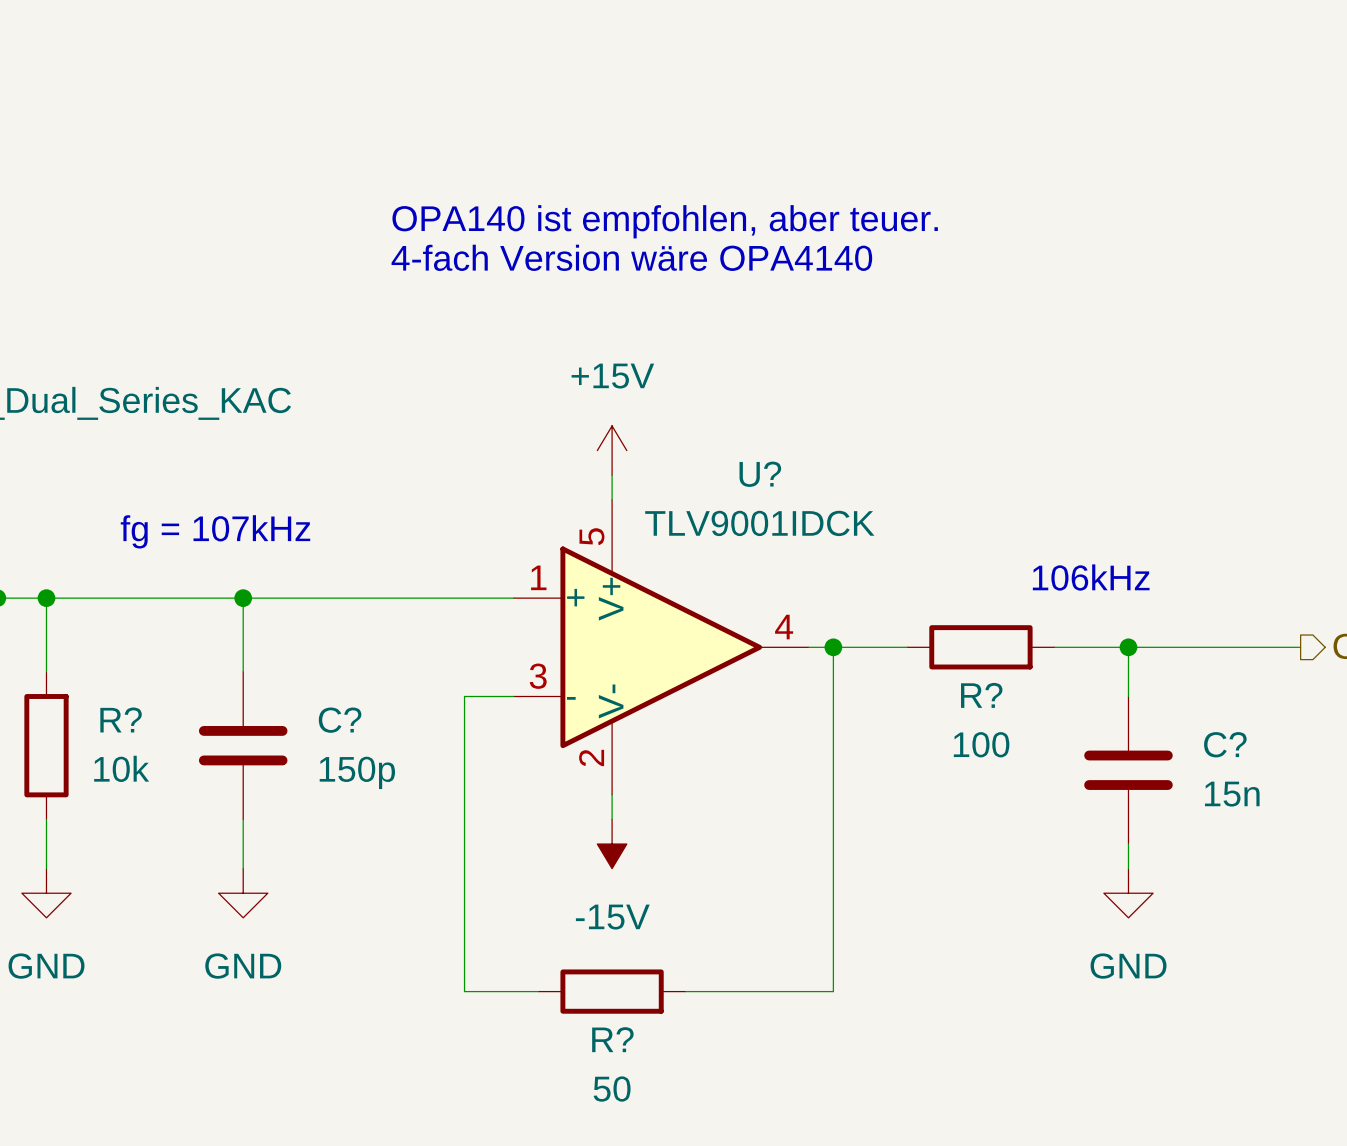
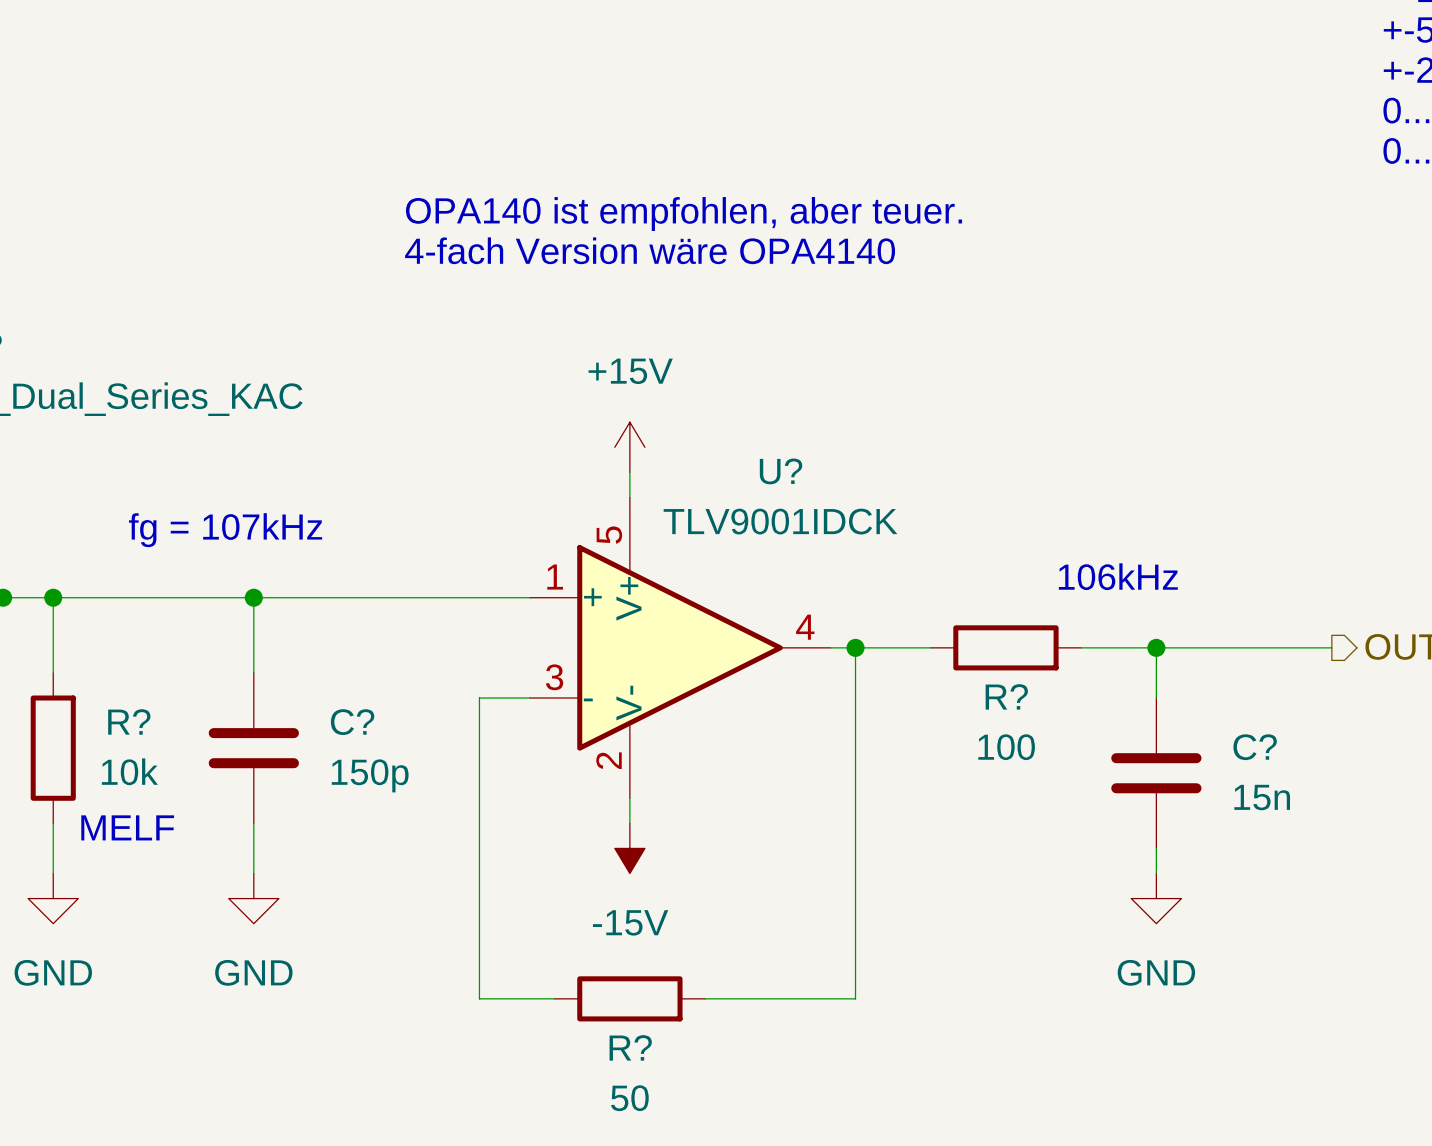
text: none -> MELF (127, 827)

